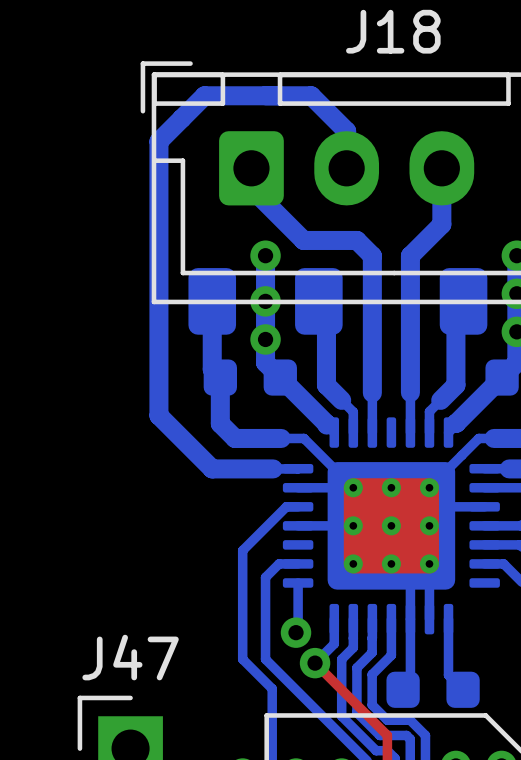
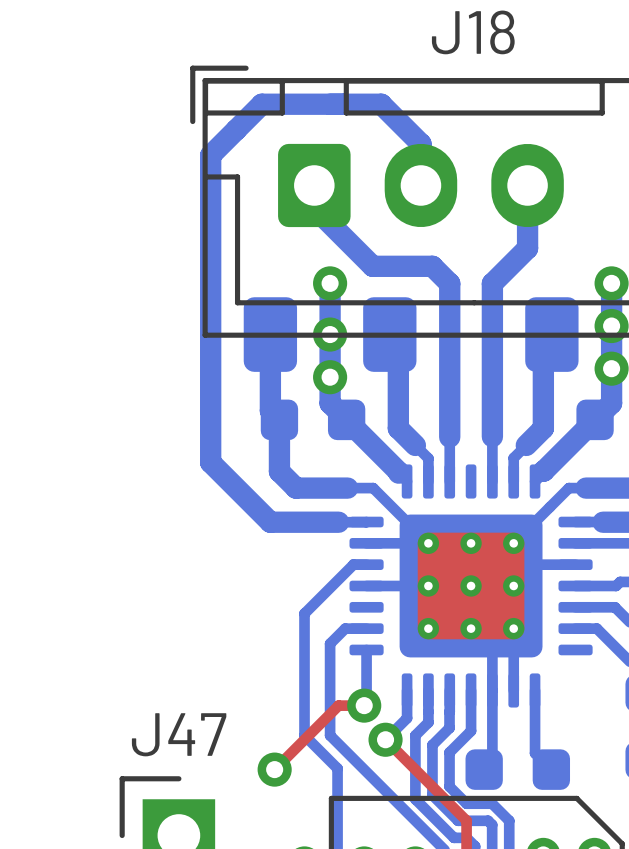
top track: none -> (364, 705) (338, 705) (274, 769)
via: none -> (274, 769)

